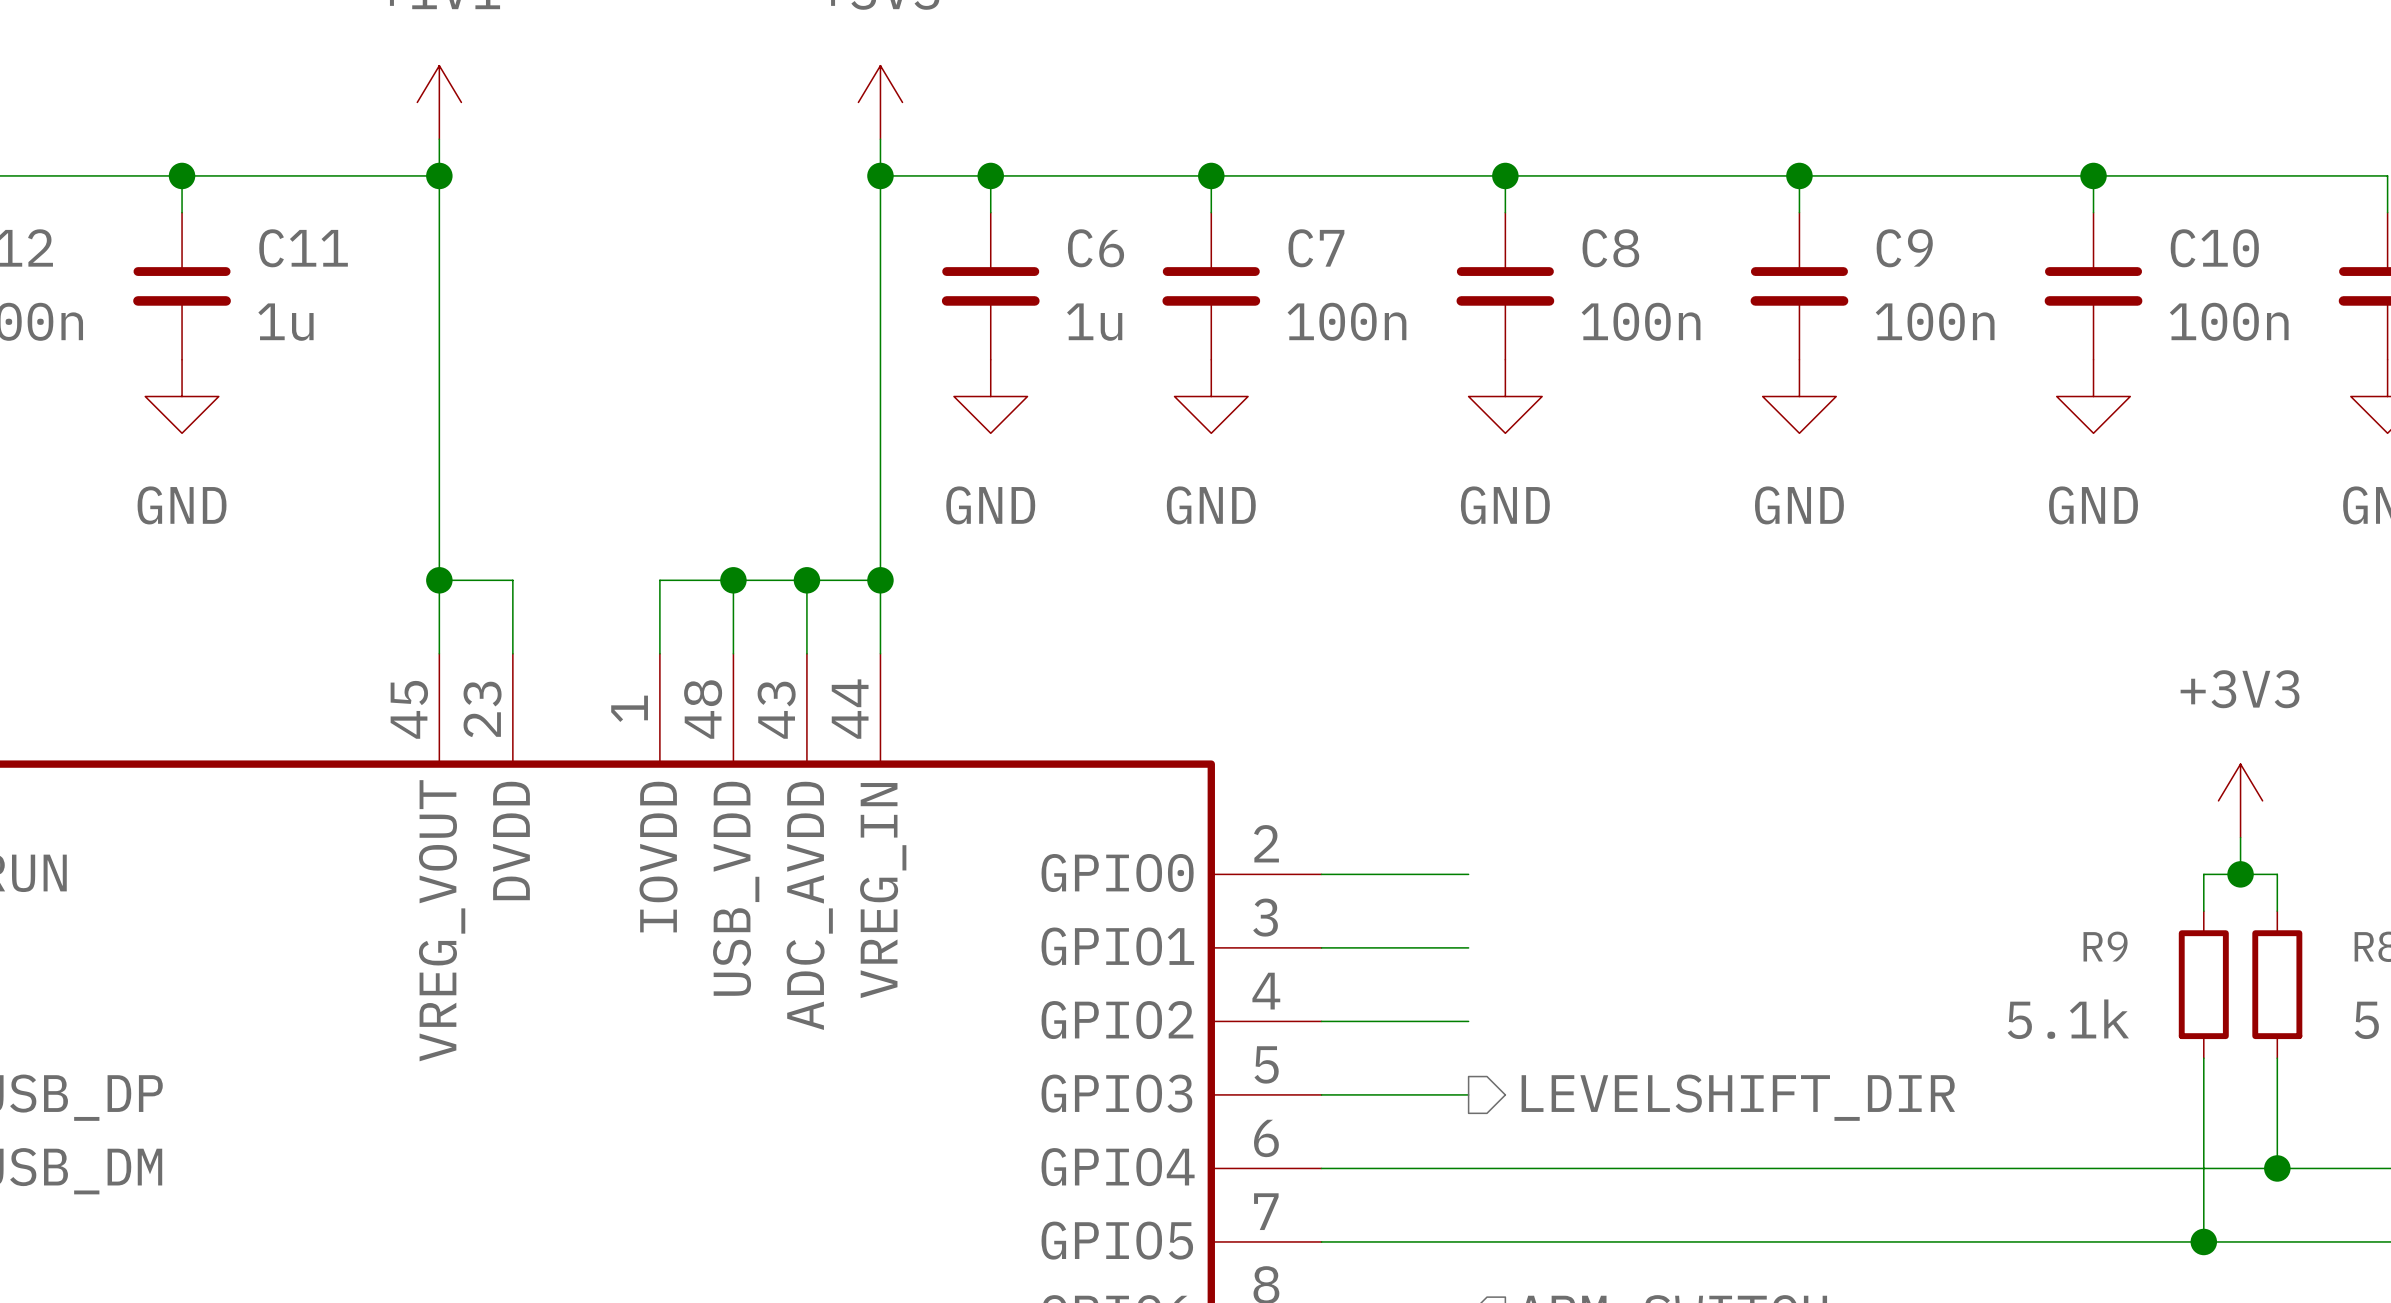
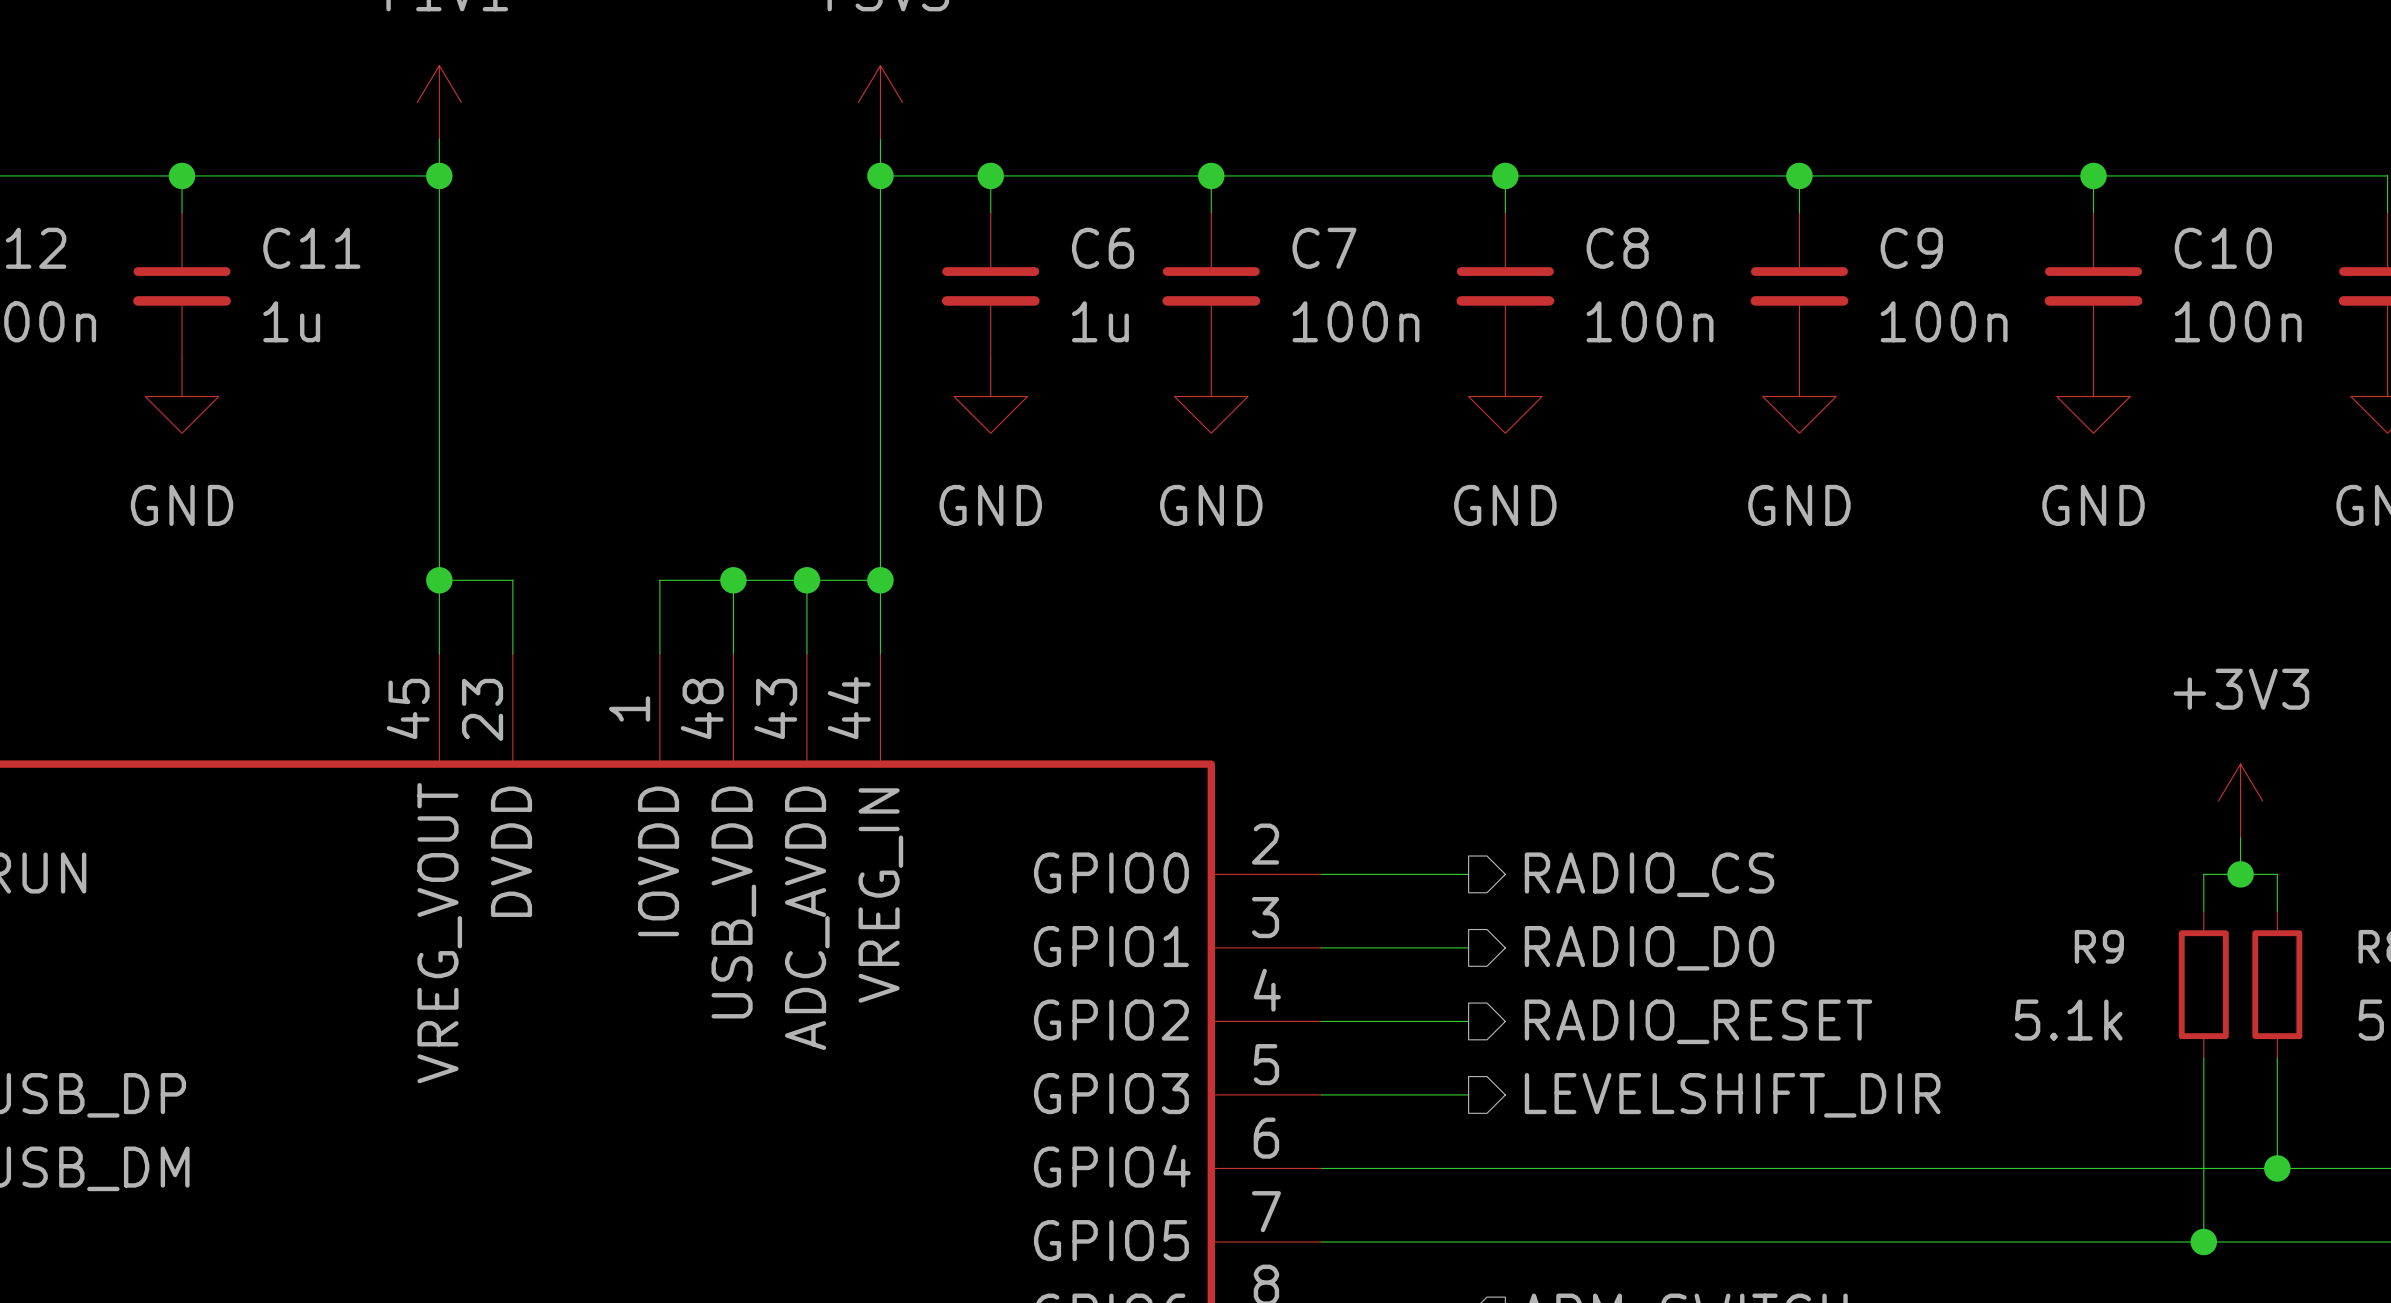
hierarchical label: none -> RADIO_CS (1649, 874)
hierarchical label: none -> RADIO_D0 (1649, 948)
hierarchical label: none -> RADIO_RESET (1698, 1021)

